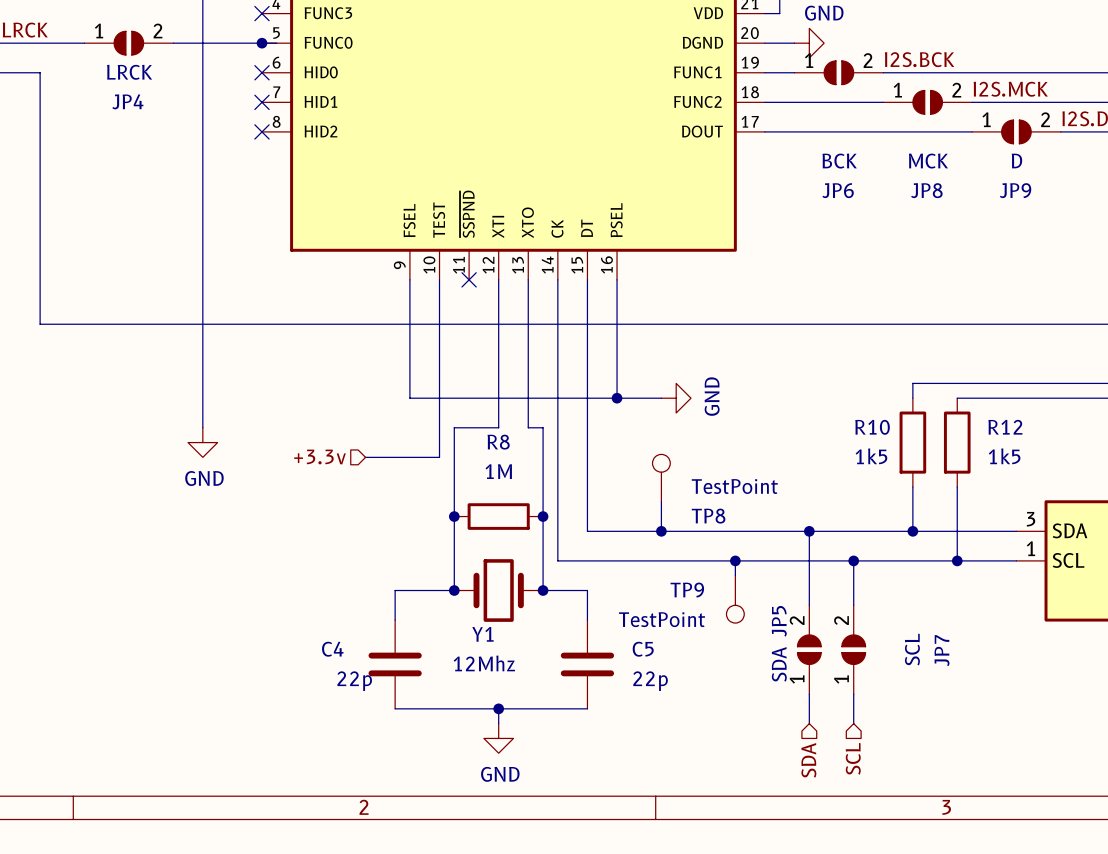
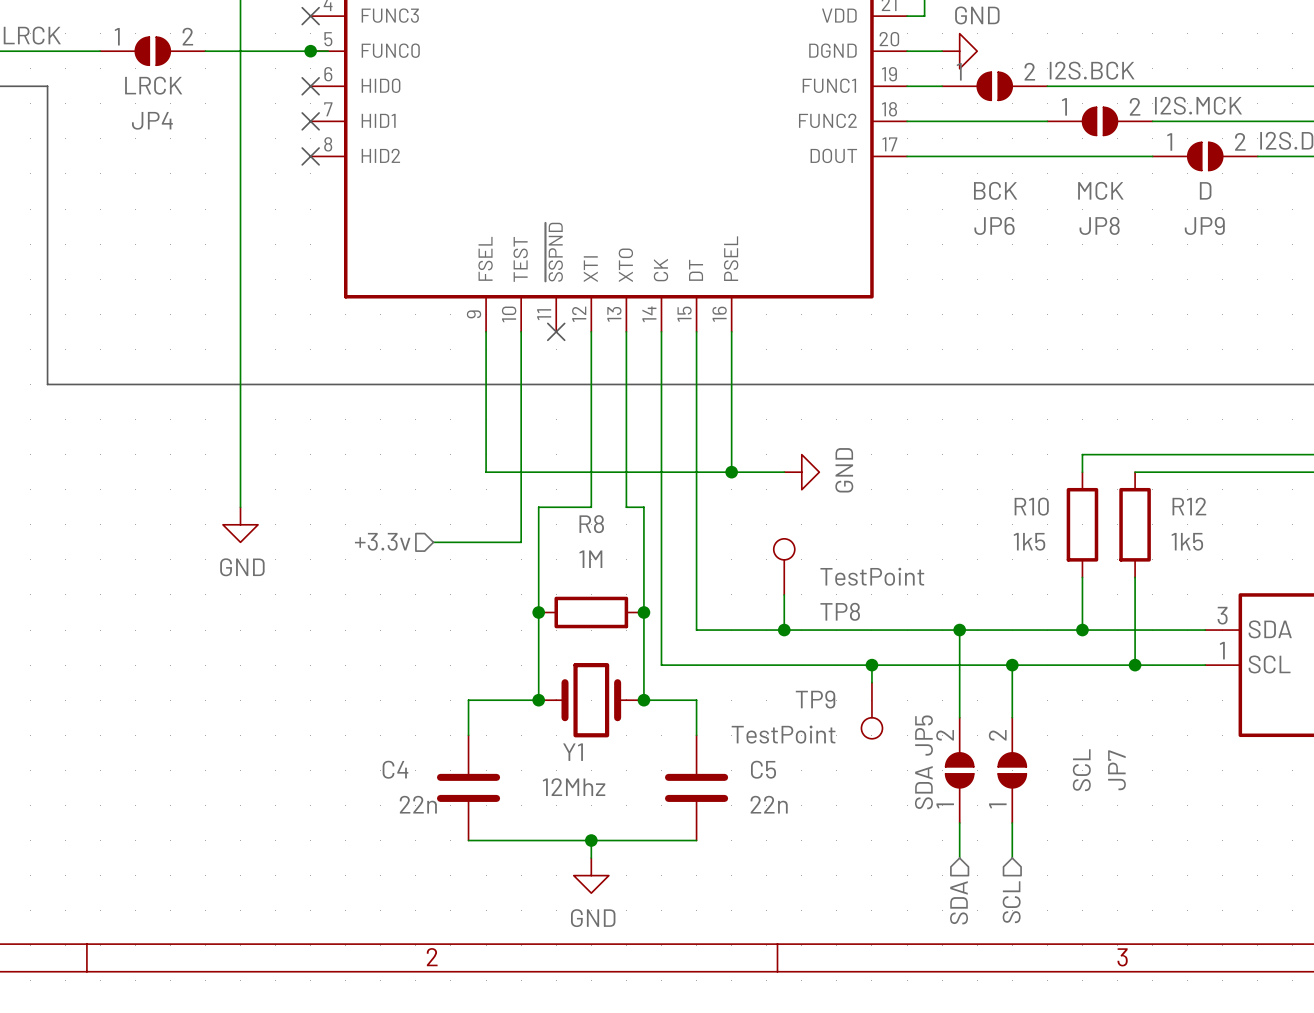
C4 value: 22p (354, 681) -> 22n (418, 804)
C5 value: 22p (650, 681) -> 22n (769, 804)

